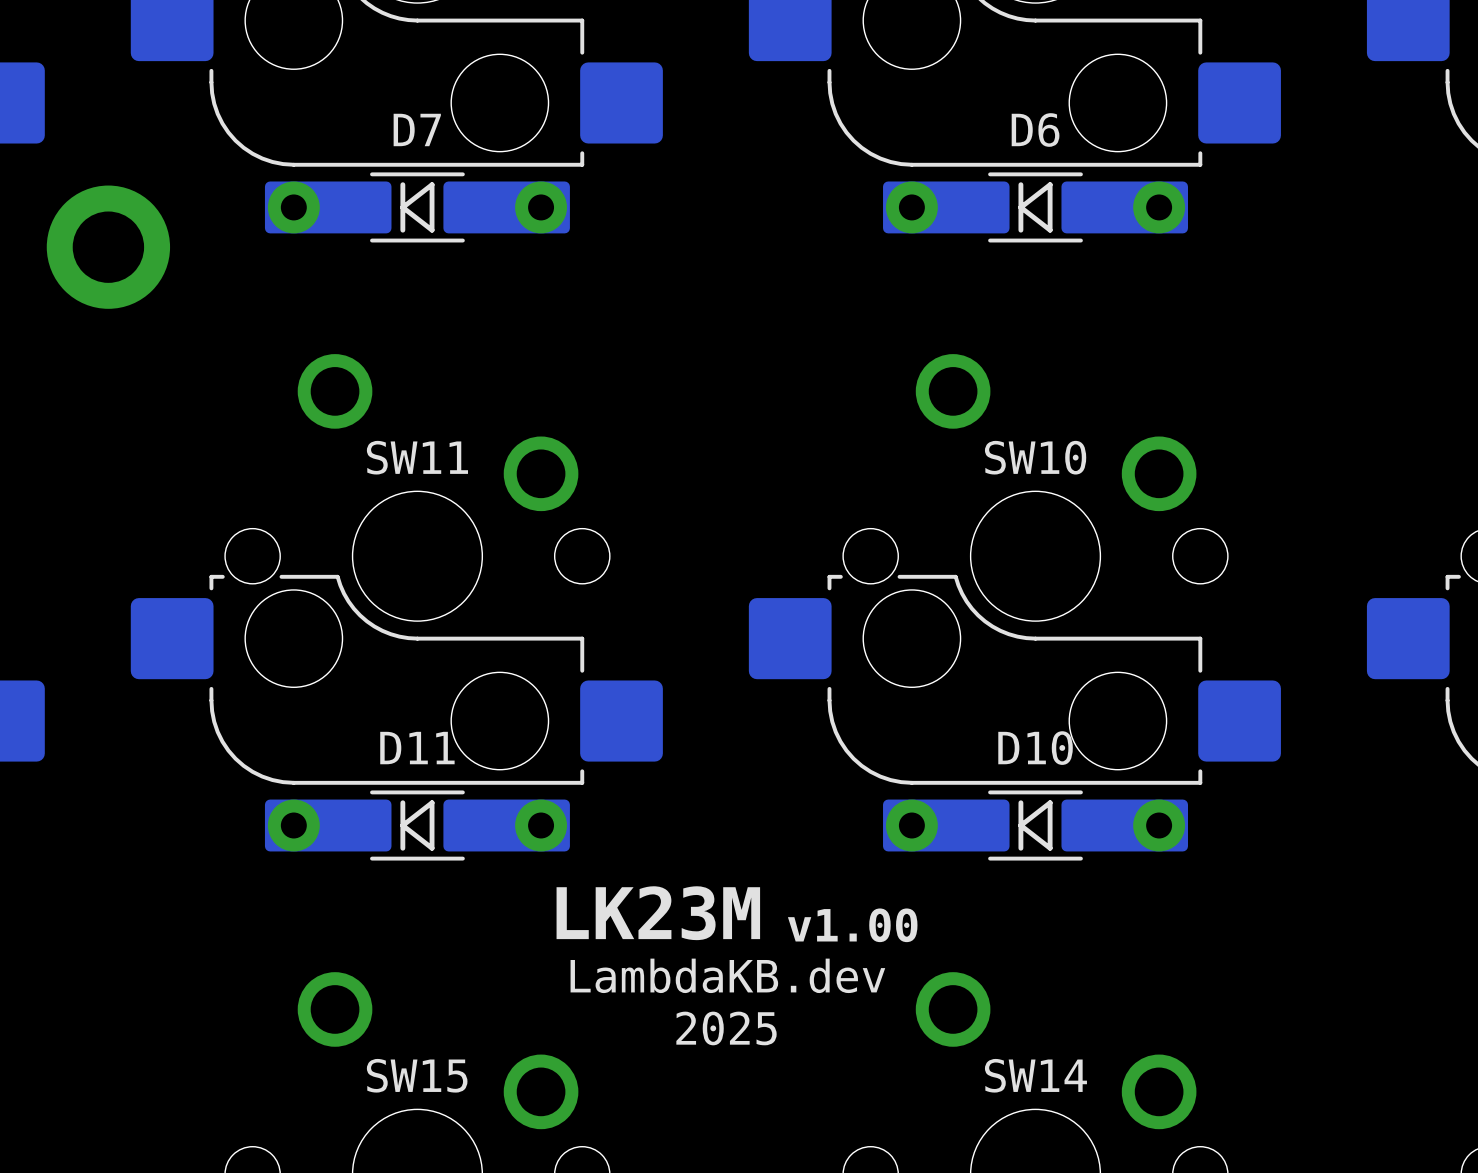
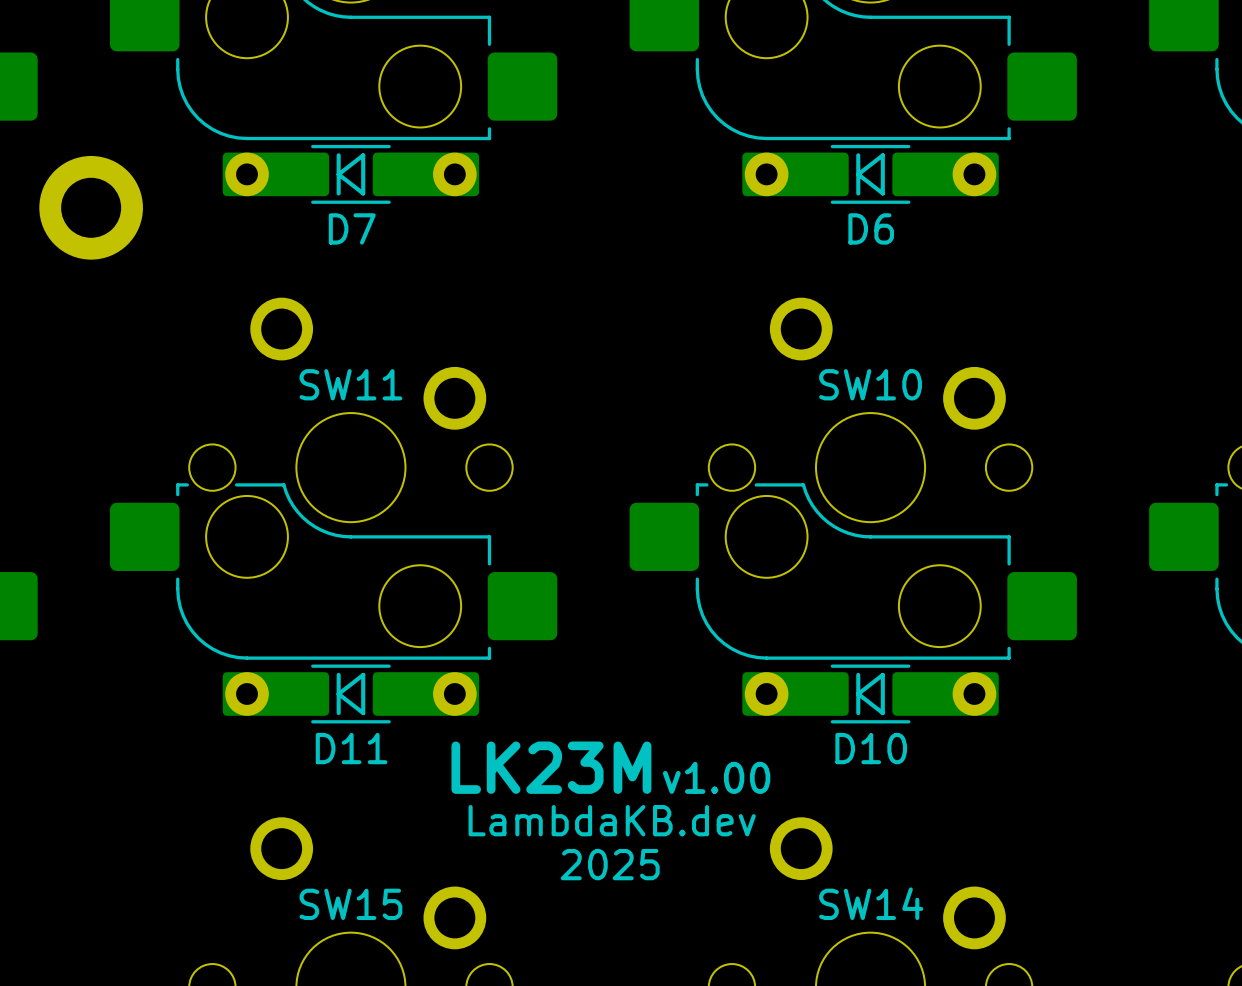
D7 name position: D7 (417, 129) -> D7 (352, 228)
D6 name position: D6 (1035, 130) -> D6 (871, 228)
D11 name position: D11 (417, 748) -> D11 (351, 748)
D10 name position: D10 (1035, 748) -> D10 (871, 748)

